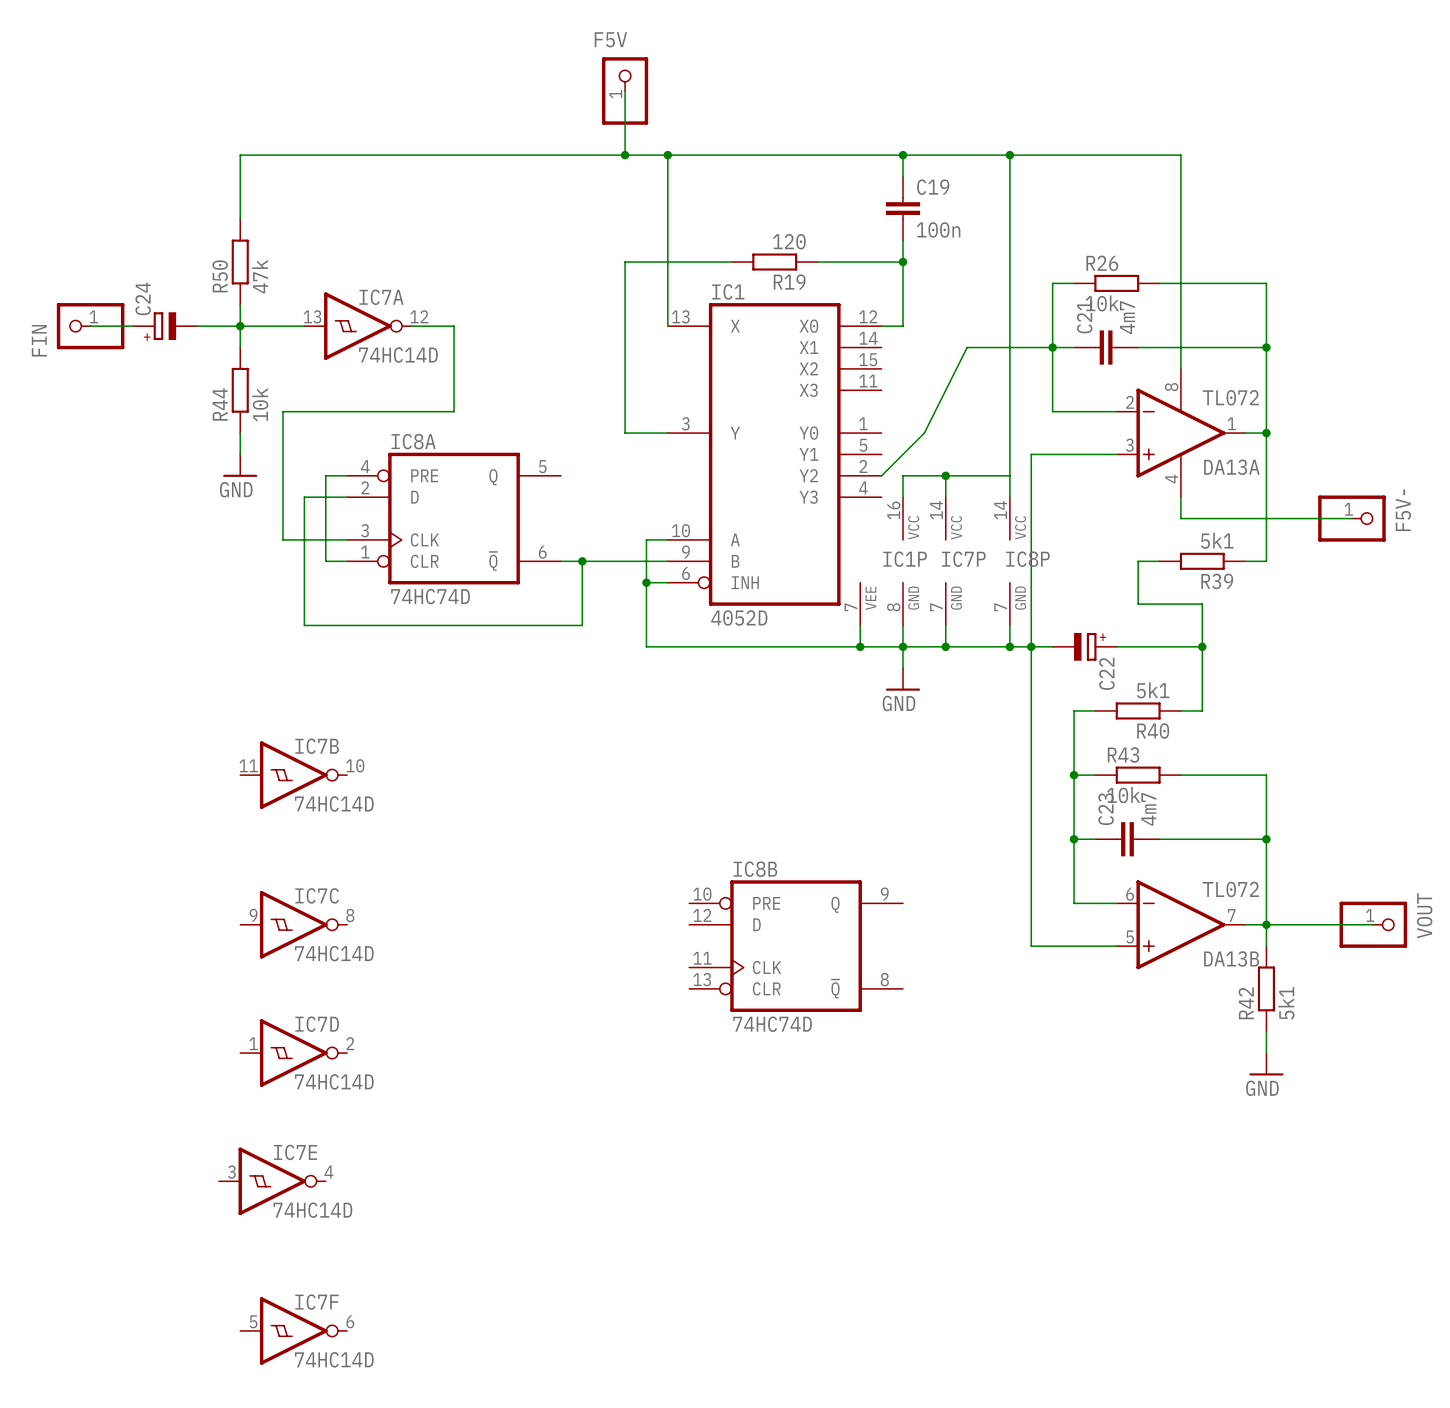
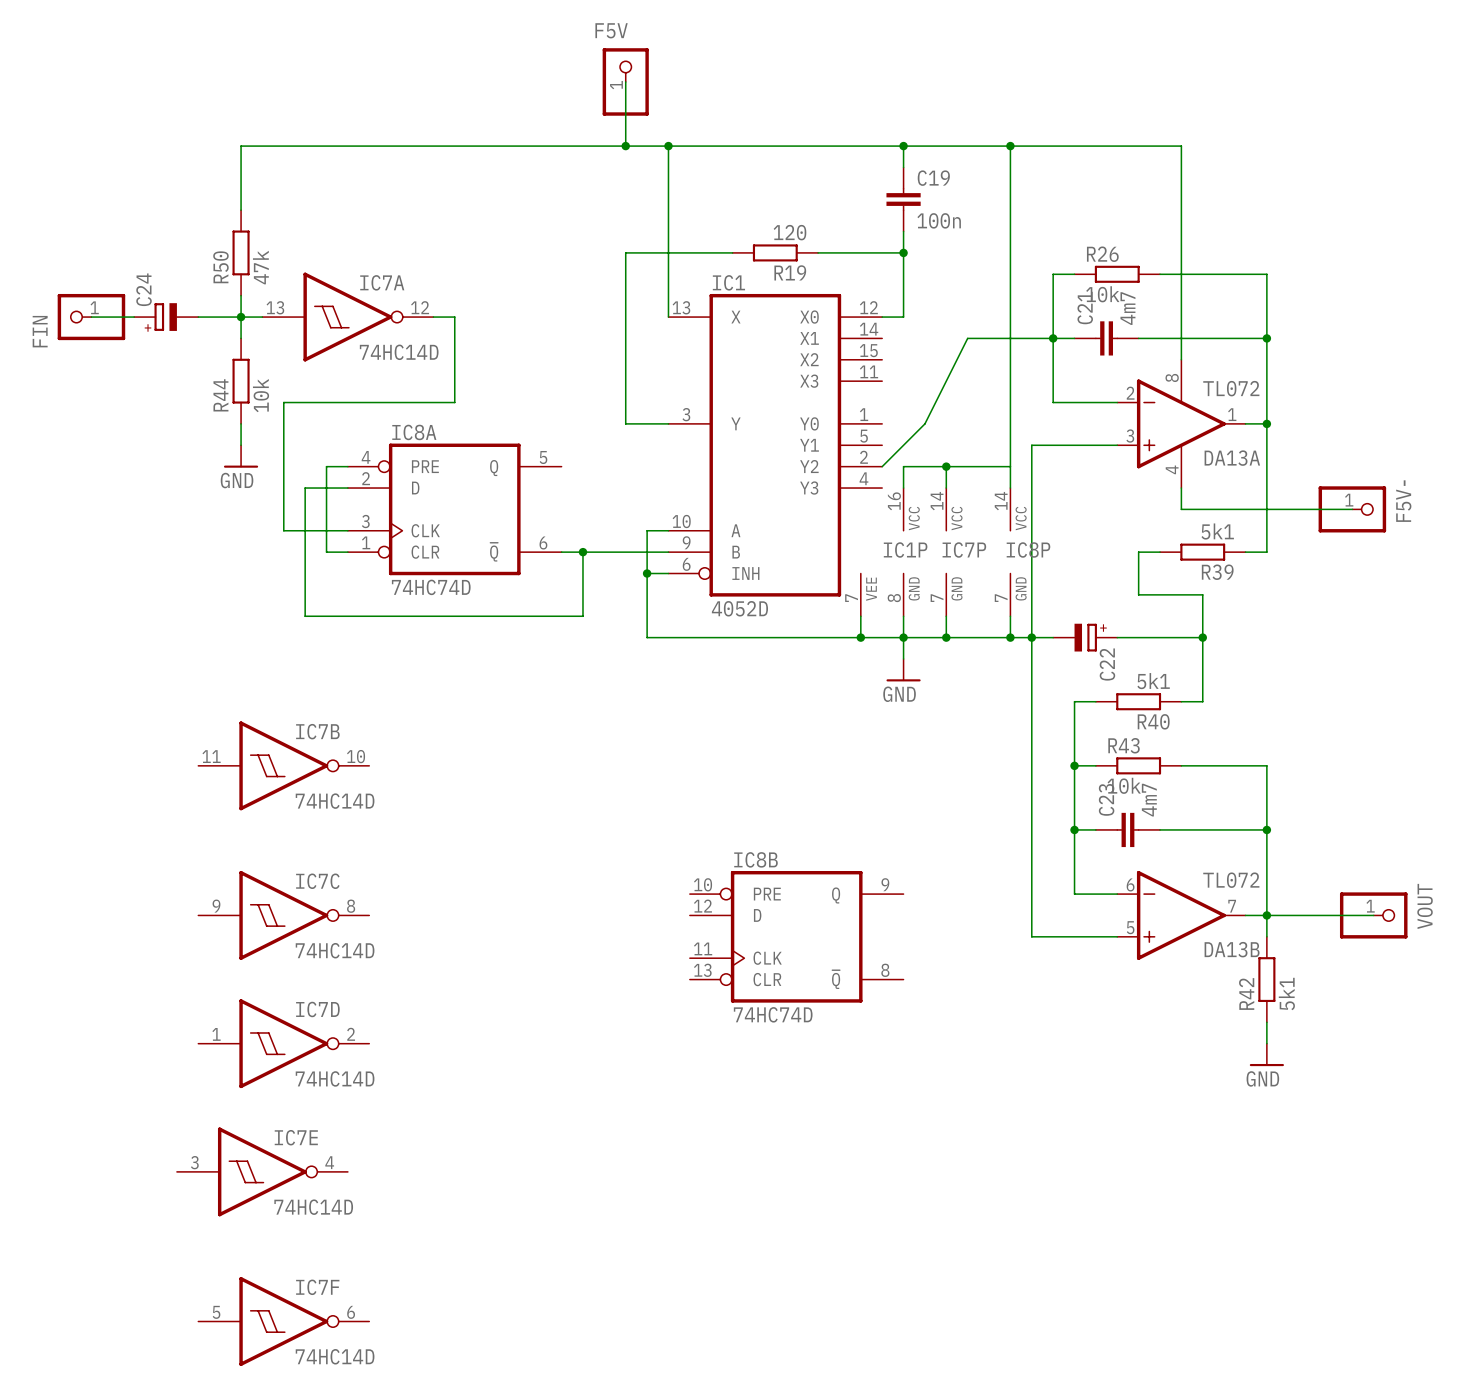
IC7A symbol: [304, 292, 412, 360] -> [262, 272, 434, 362]
IC7B symbol: [240, 741, 348, 809] -> [198, 721, 370, 811]
IC7C symbol: [240, 890, 348, 959] -> [198, 871, 370, 960]
IC7D symbol: [240, 1019, 348, 1087] -> [198, 999, 370, 1089]
IC7E symbol: [218, 1147, 326, 1216] -> [176, 1127, 348, 1217]
IC7F symbol: [240, 1297, 348, 1365] -> [198, 1277, 370, 1366]

